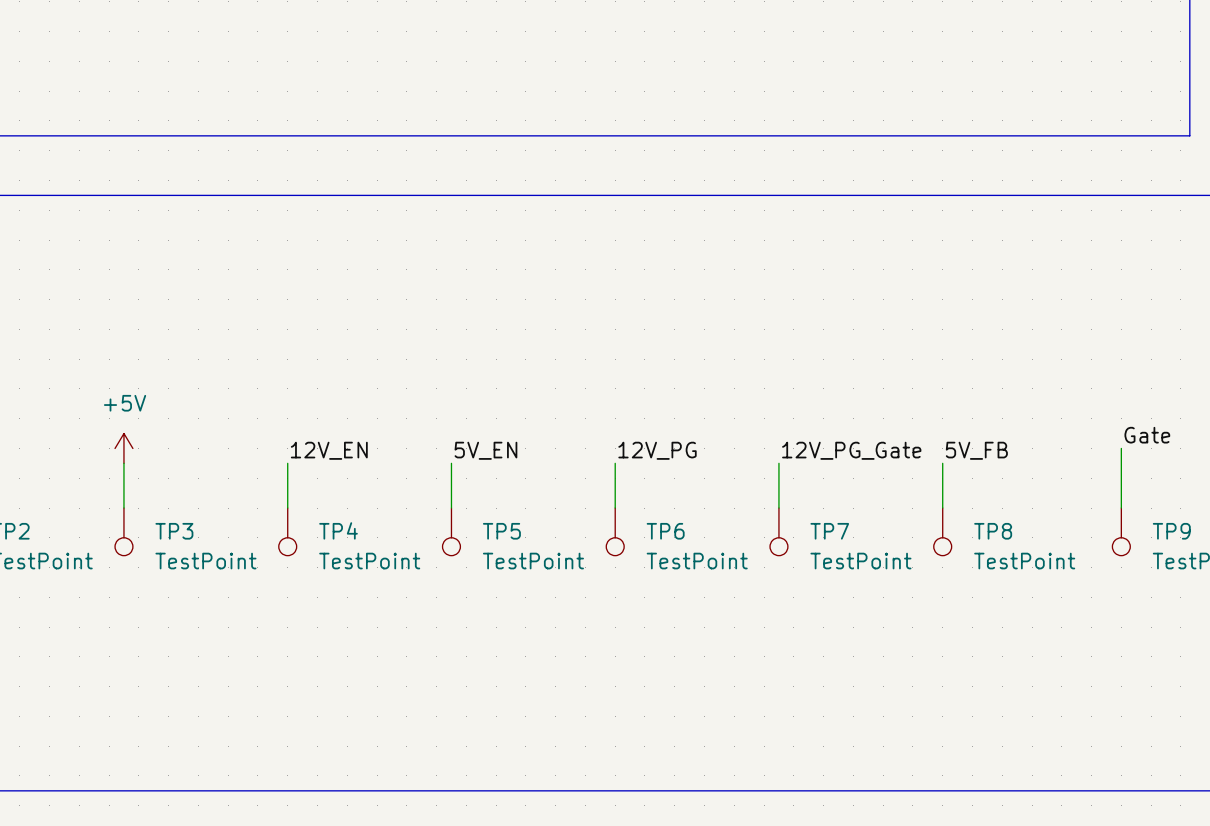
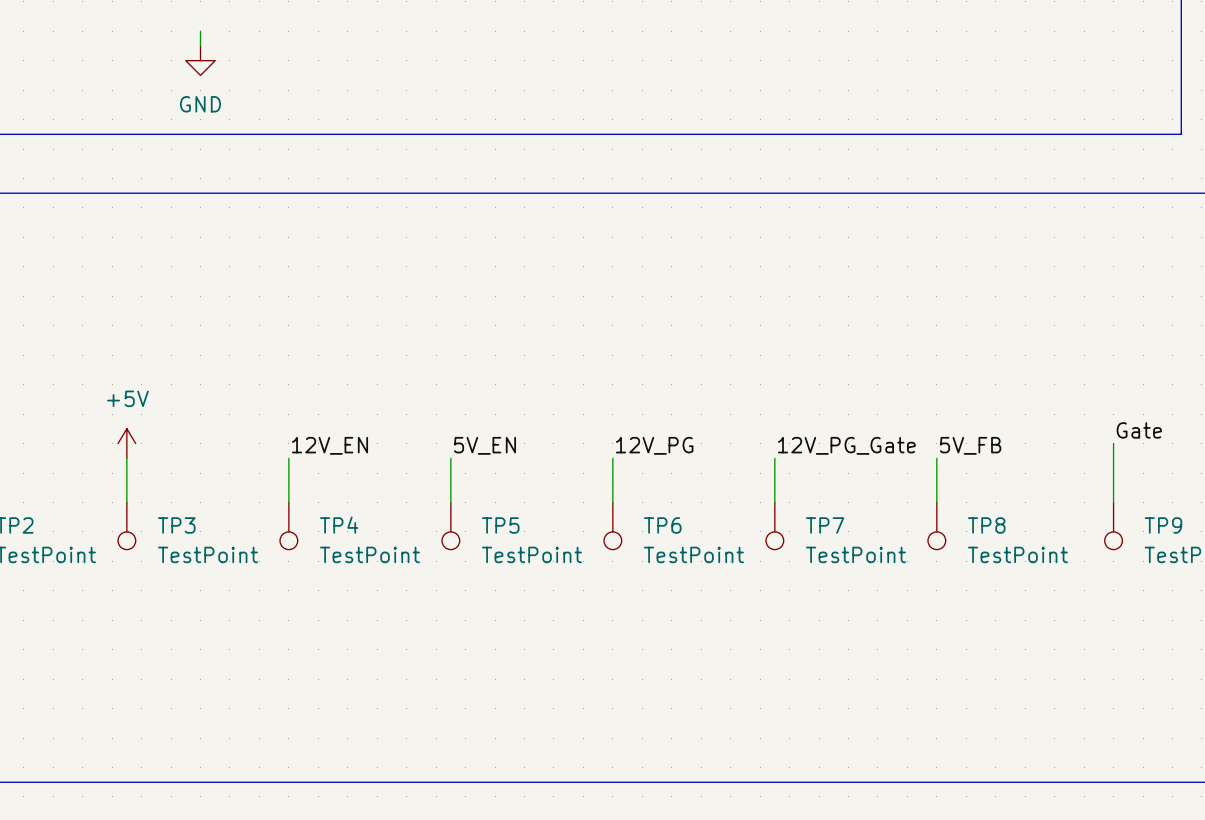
wire: none -> (200, 31) (200, 45)
power symbol: none -> GND (200, 60)

